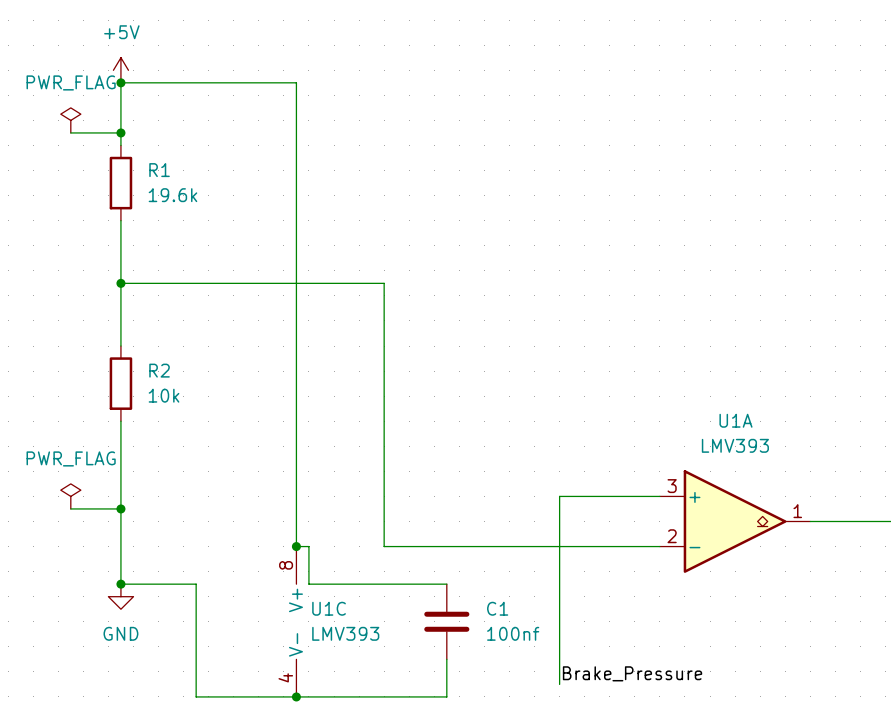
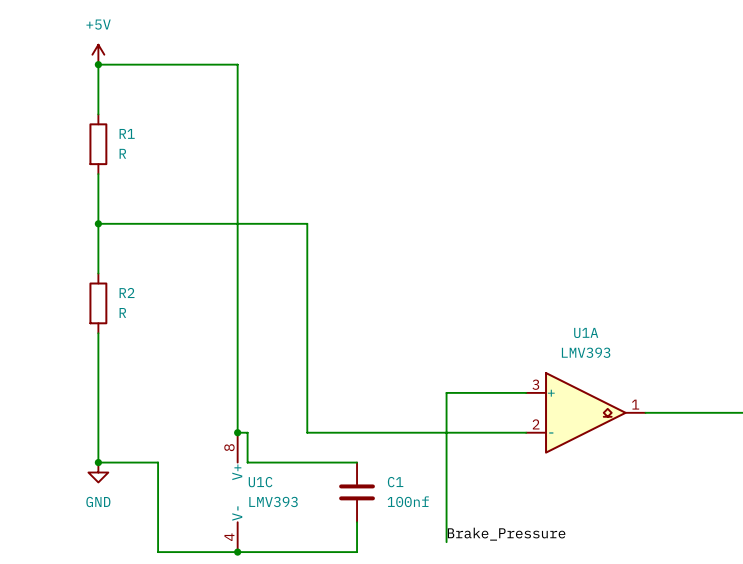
power symbol: PWR_FLAG (70, 120) -> none
wire: (70, 132) (120, 132) -> none
junction: (120, 132) -> none
R1 value: 19.6k (172, 195) -> R (122, 153)
R2 value: 10k (164, 395) -> R (122, 312)
power symbol: PWR_FLAG (70, 496) -> none
wire: (70, 508) (120, 508) -> none
junction: (120, 508) -> none

